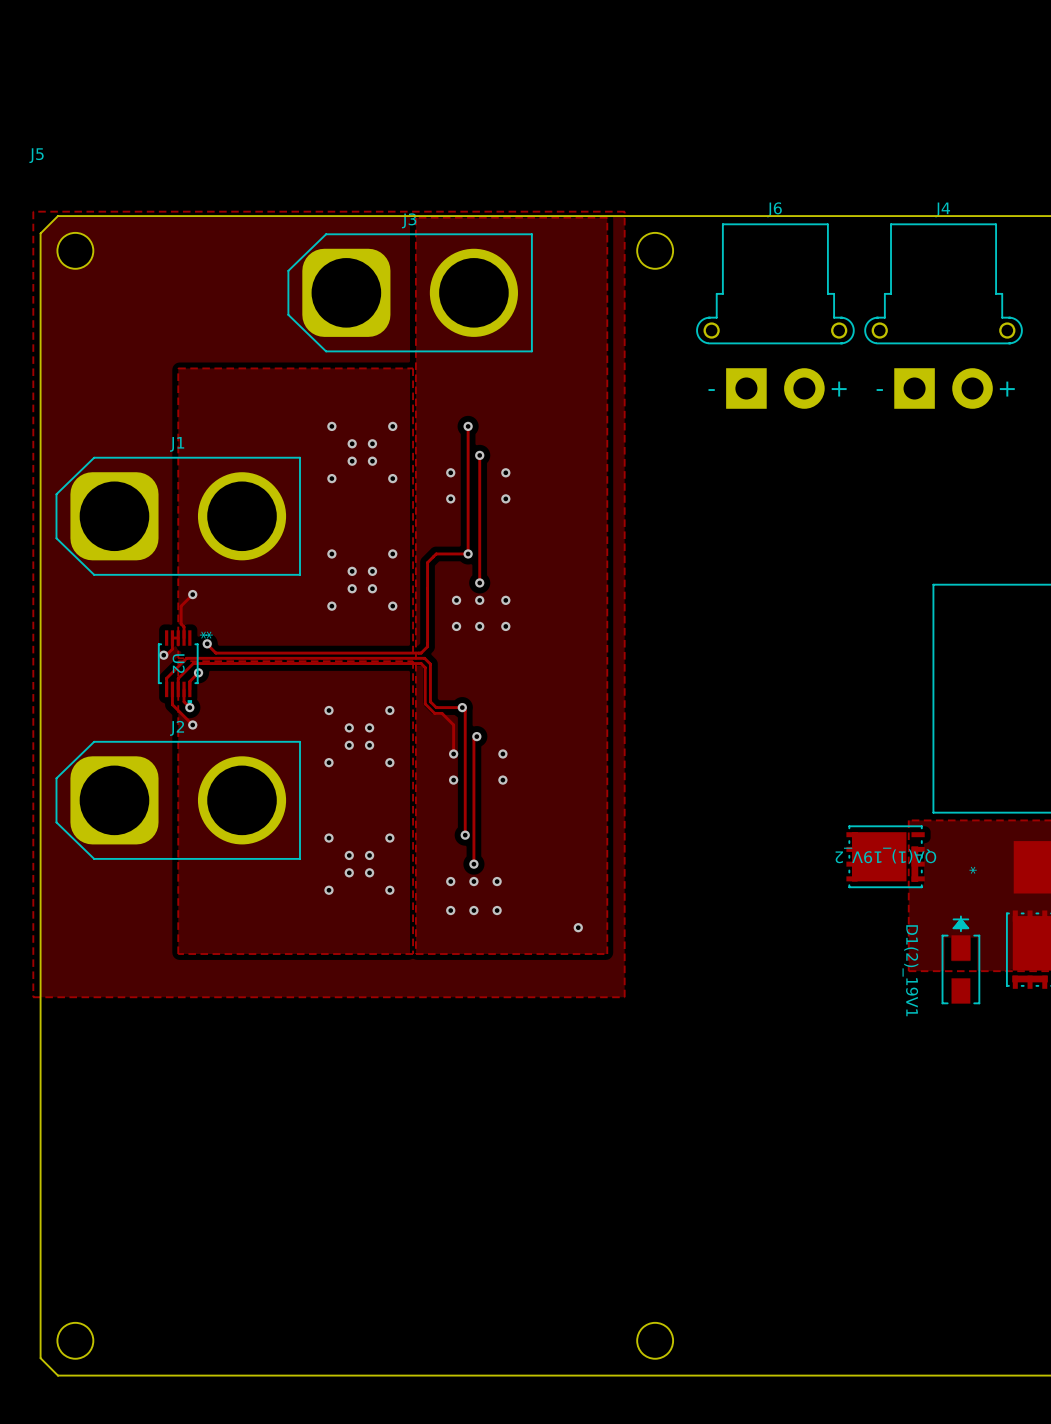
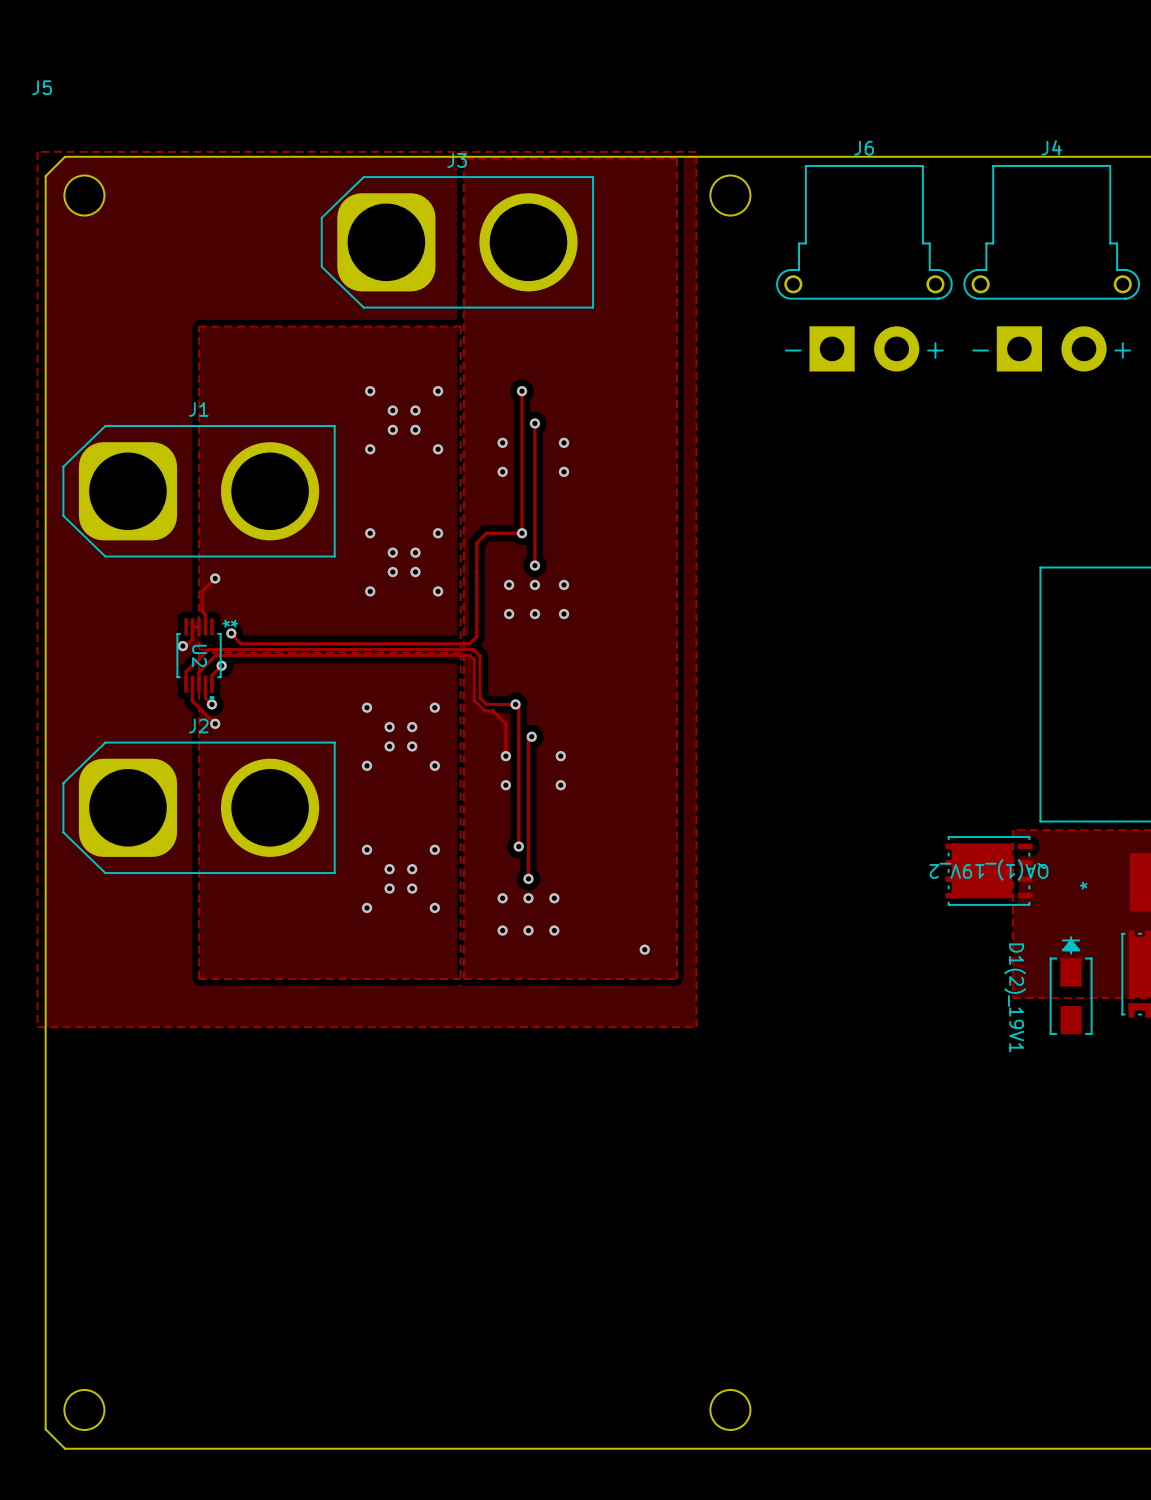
QA(1)_19V_2 footprint: [846, 825, 925, 889] -> [945, 835, 1033, 906]

